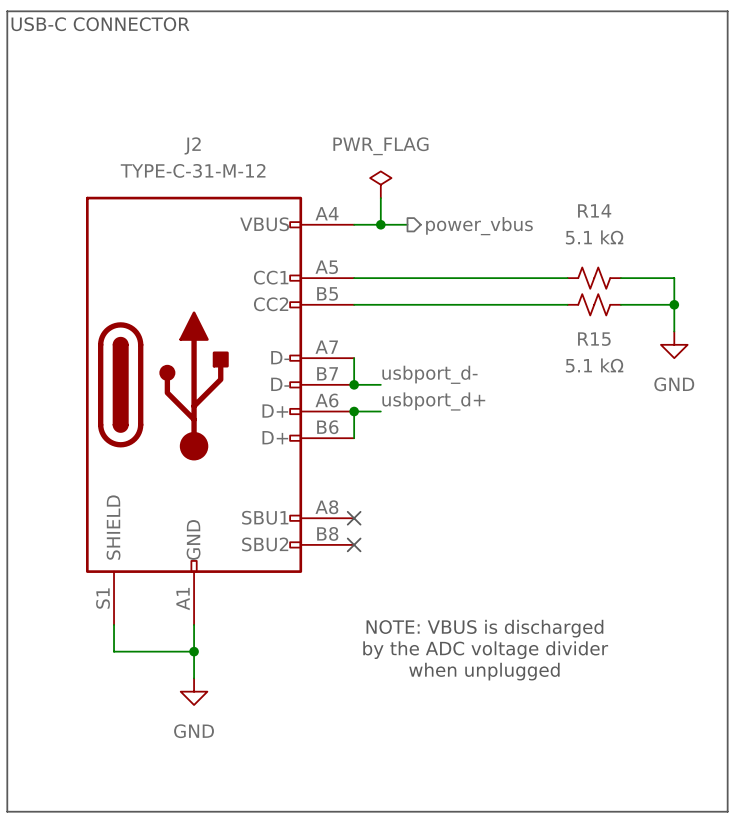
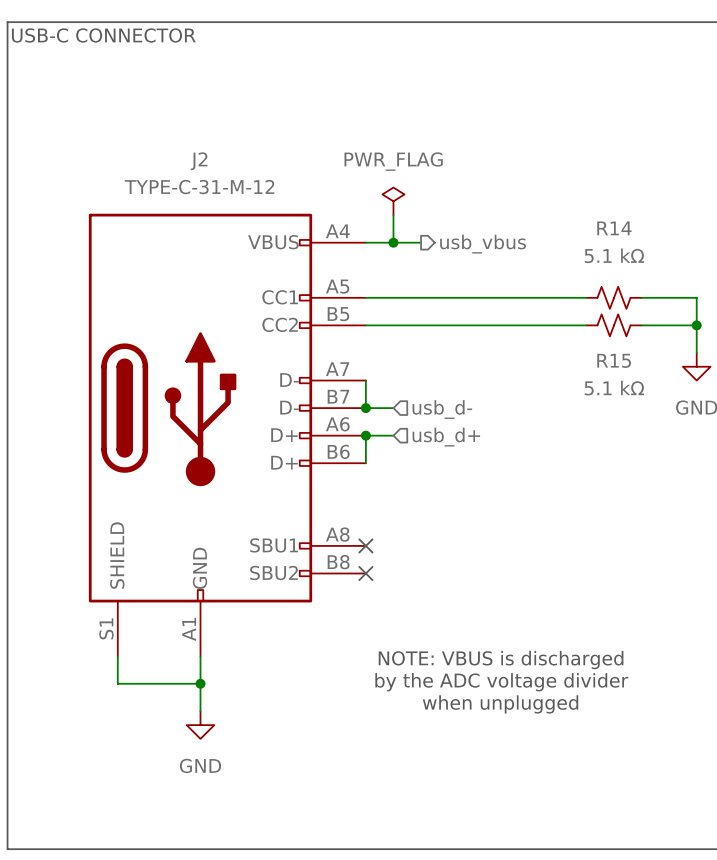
hierarchical label: power_vbus (479, 226) -> usb_vbus (483, 244)
label: usbport_d- (429, 374) -> none
hierarchical label: none -> usb_d- (442, 409)
label: usbport_d+ (433, 401) -> none
hierarchical label: none -> usb_d+ (446, 437)

